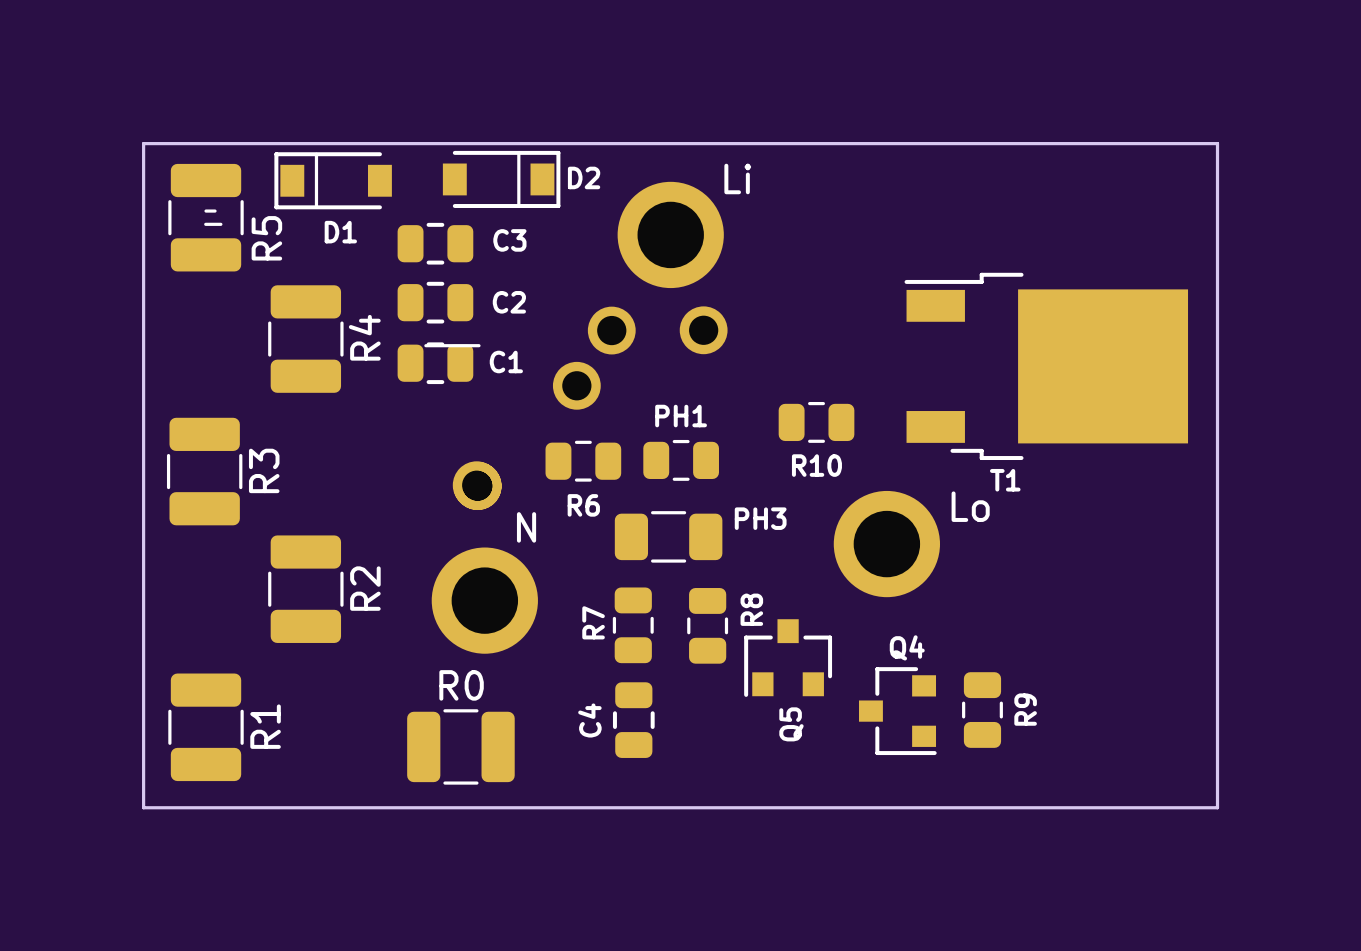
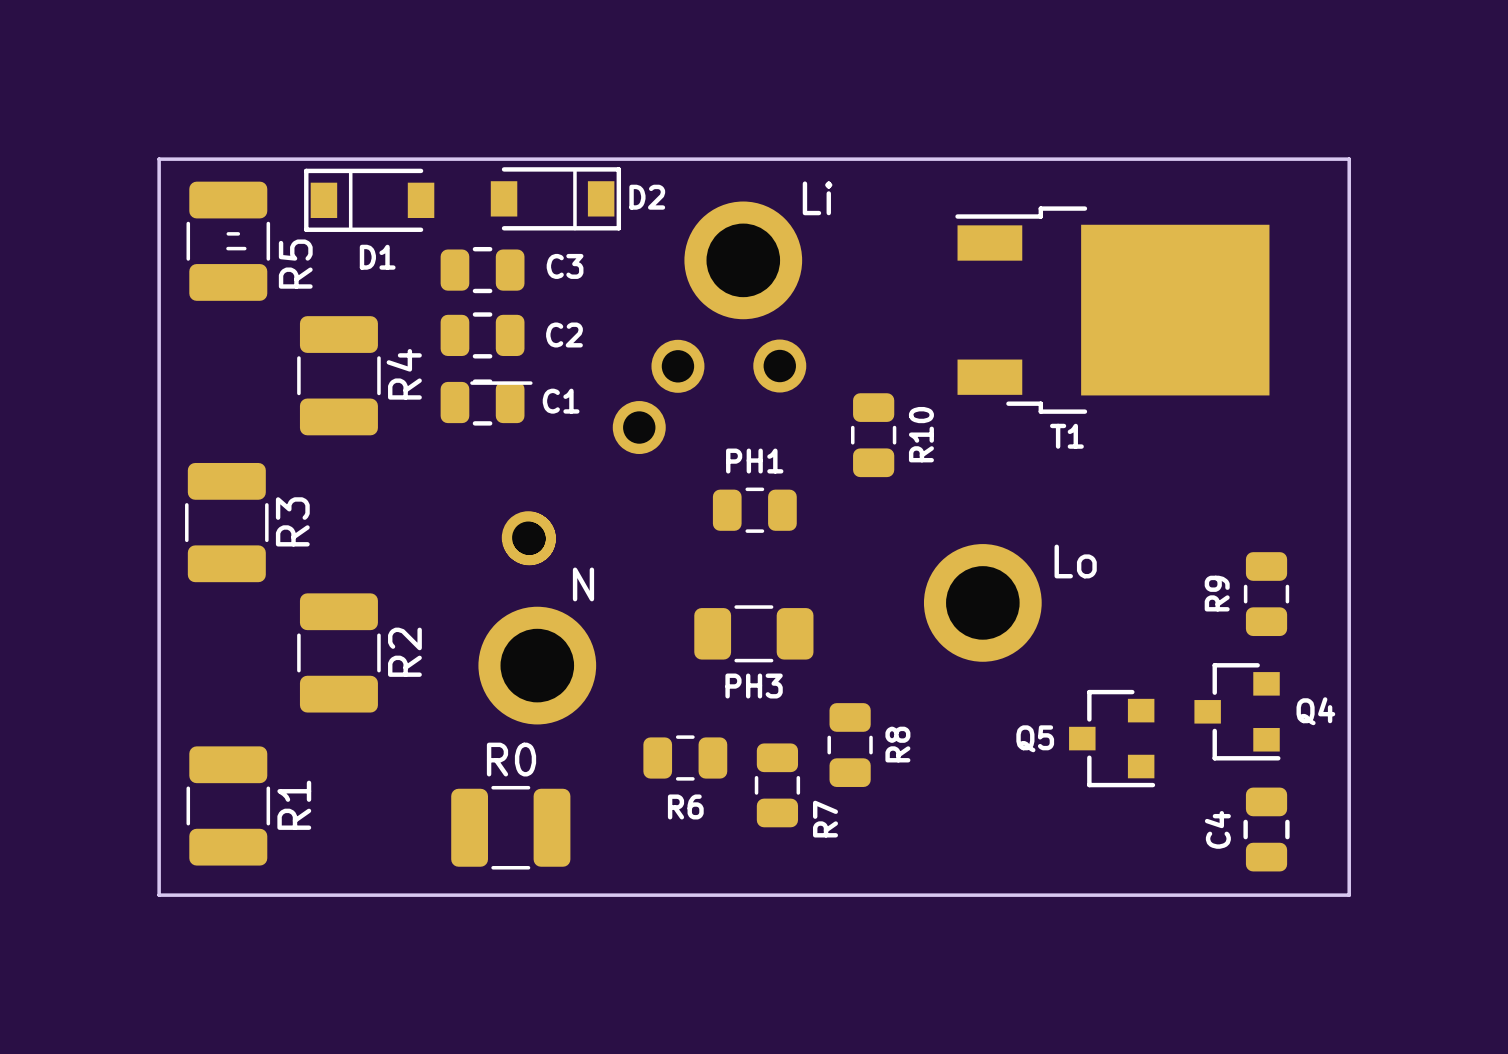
T1 position: (1046, 366) -> (1112, 310)
R10 rotation: 0° (816, 422) -> 90° clockwise (873, 435)
R6 position: (583, 461) -> (685, 758)
R10 name position: R10 (816, 465) -> R10 (921, 434)
PH3 name position: PH3 (760, 518) -> PH3 (754, 686)
PH3 position: (668, 536) -> (753, 633)
R8 name position: R8 (751, 609) -> R8 (897, 744)
R7 name position: R7 (593, 622) -> R7 (825, 819)
R7 position: (633, 625) -> (777, 785)
R8 position: (707, 625) -> (850, 745)
Q4 name position: Q4 (907, 647) -> Q4 (1315, 711)
Q5 rotation: 0° (788, 658) -> 90° counterclockwise (1112, 738)
Q5 position: (788, 658) -> (1112, 738)
R9 name position: R9 (1025, 709) -> R9 (1217, 593)
R9 position: (982, 710) -> (1266, 594)
Q4 position: (897, 711) -> (1237, 711)
C4 position: (633, 720) -> (1266, 829)
Q5 name position: Q5 (791, 724) -> Q5 (1035, 738)

